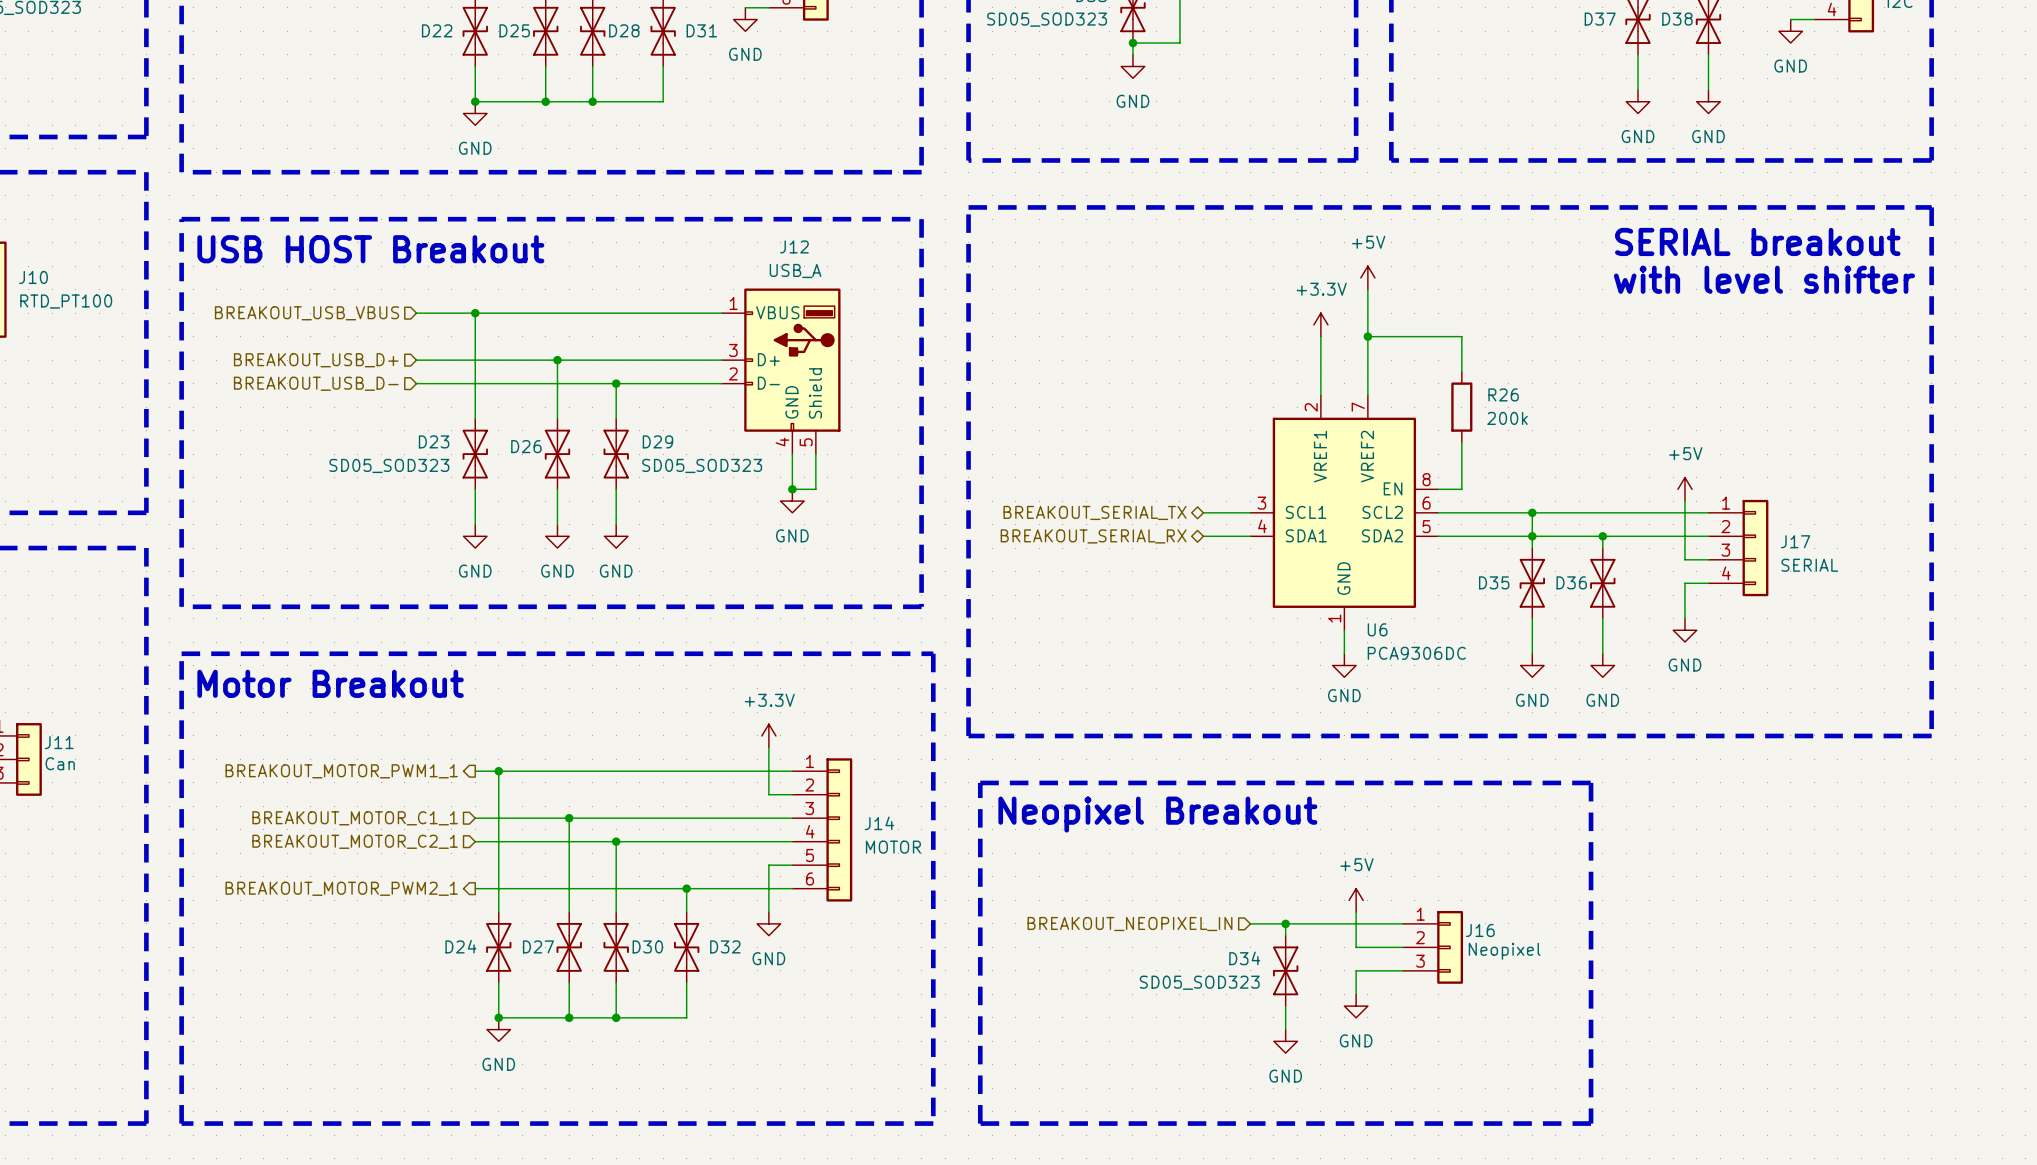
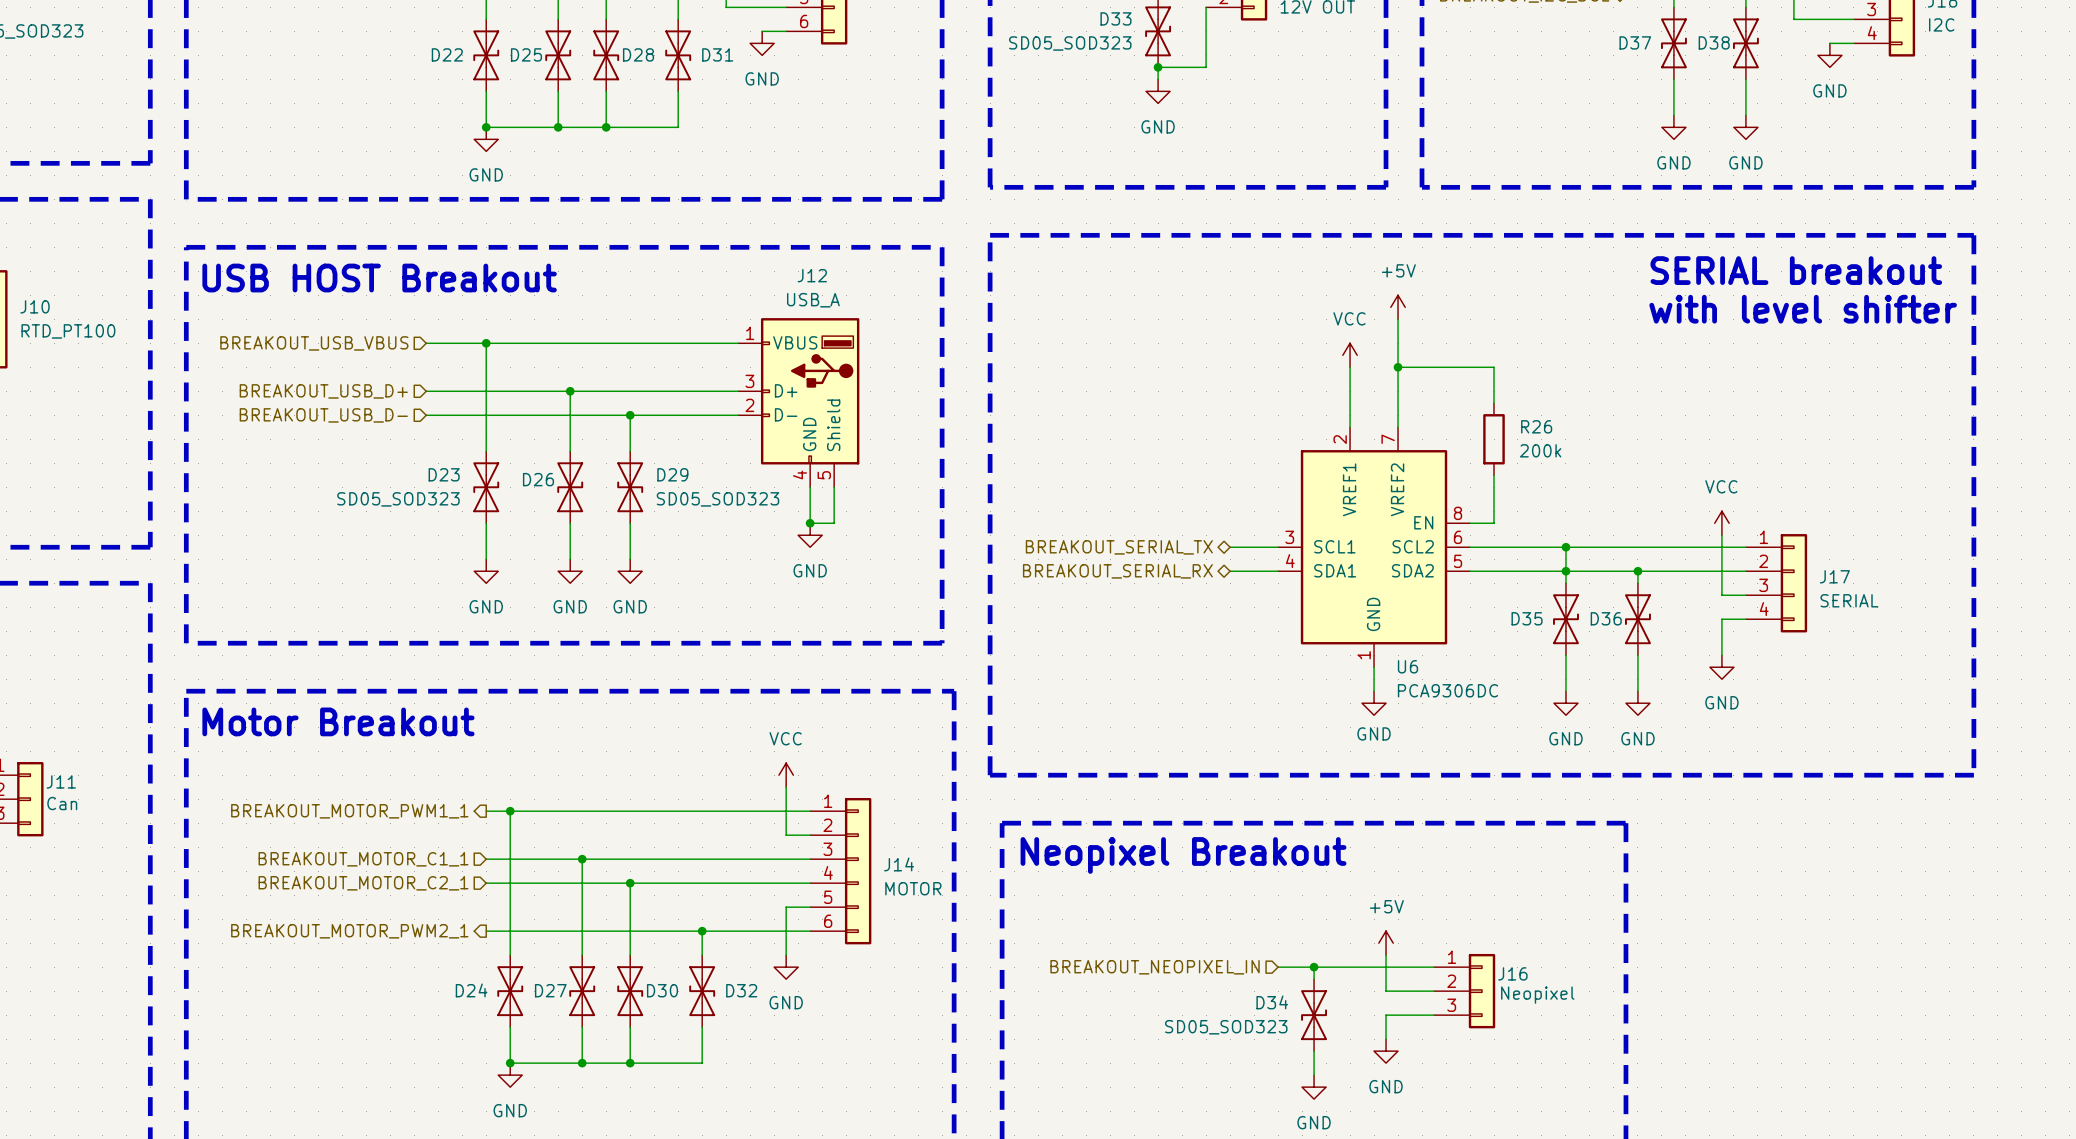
power symbol: +3.3V (1320, 324) -> VCC (1350, 355)
power symbol: +5V (1684, 489) -> VCC (1721, 523)
power symbol: +3.3V (768, 735) -> VCC (786, 775)

